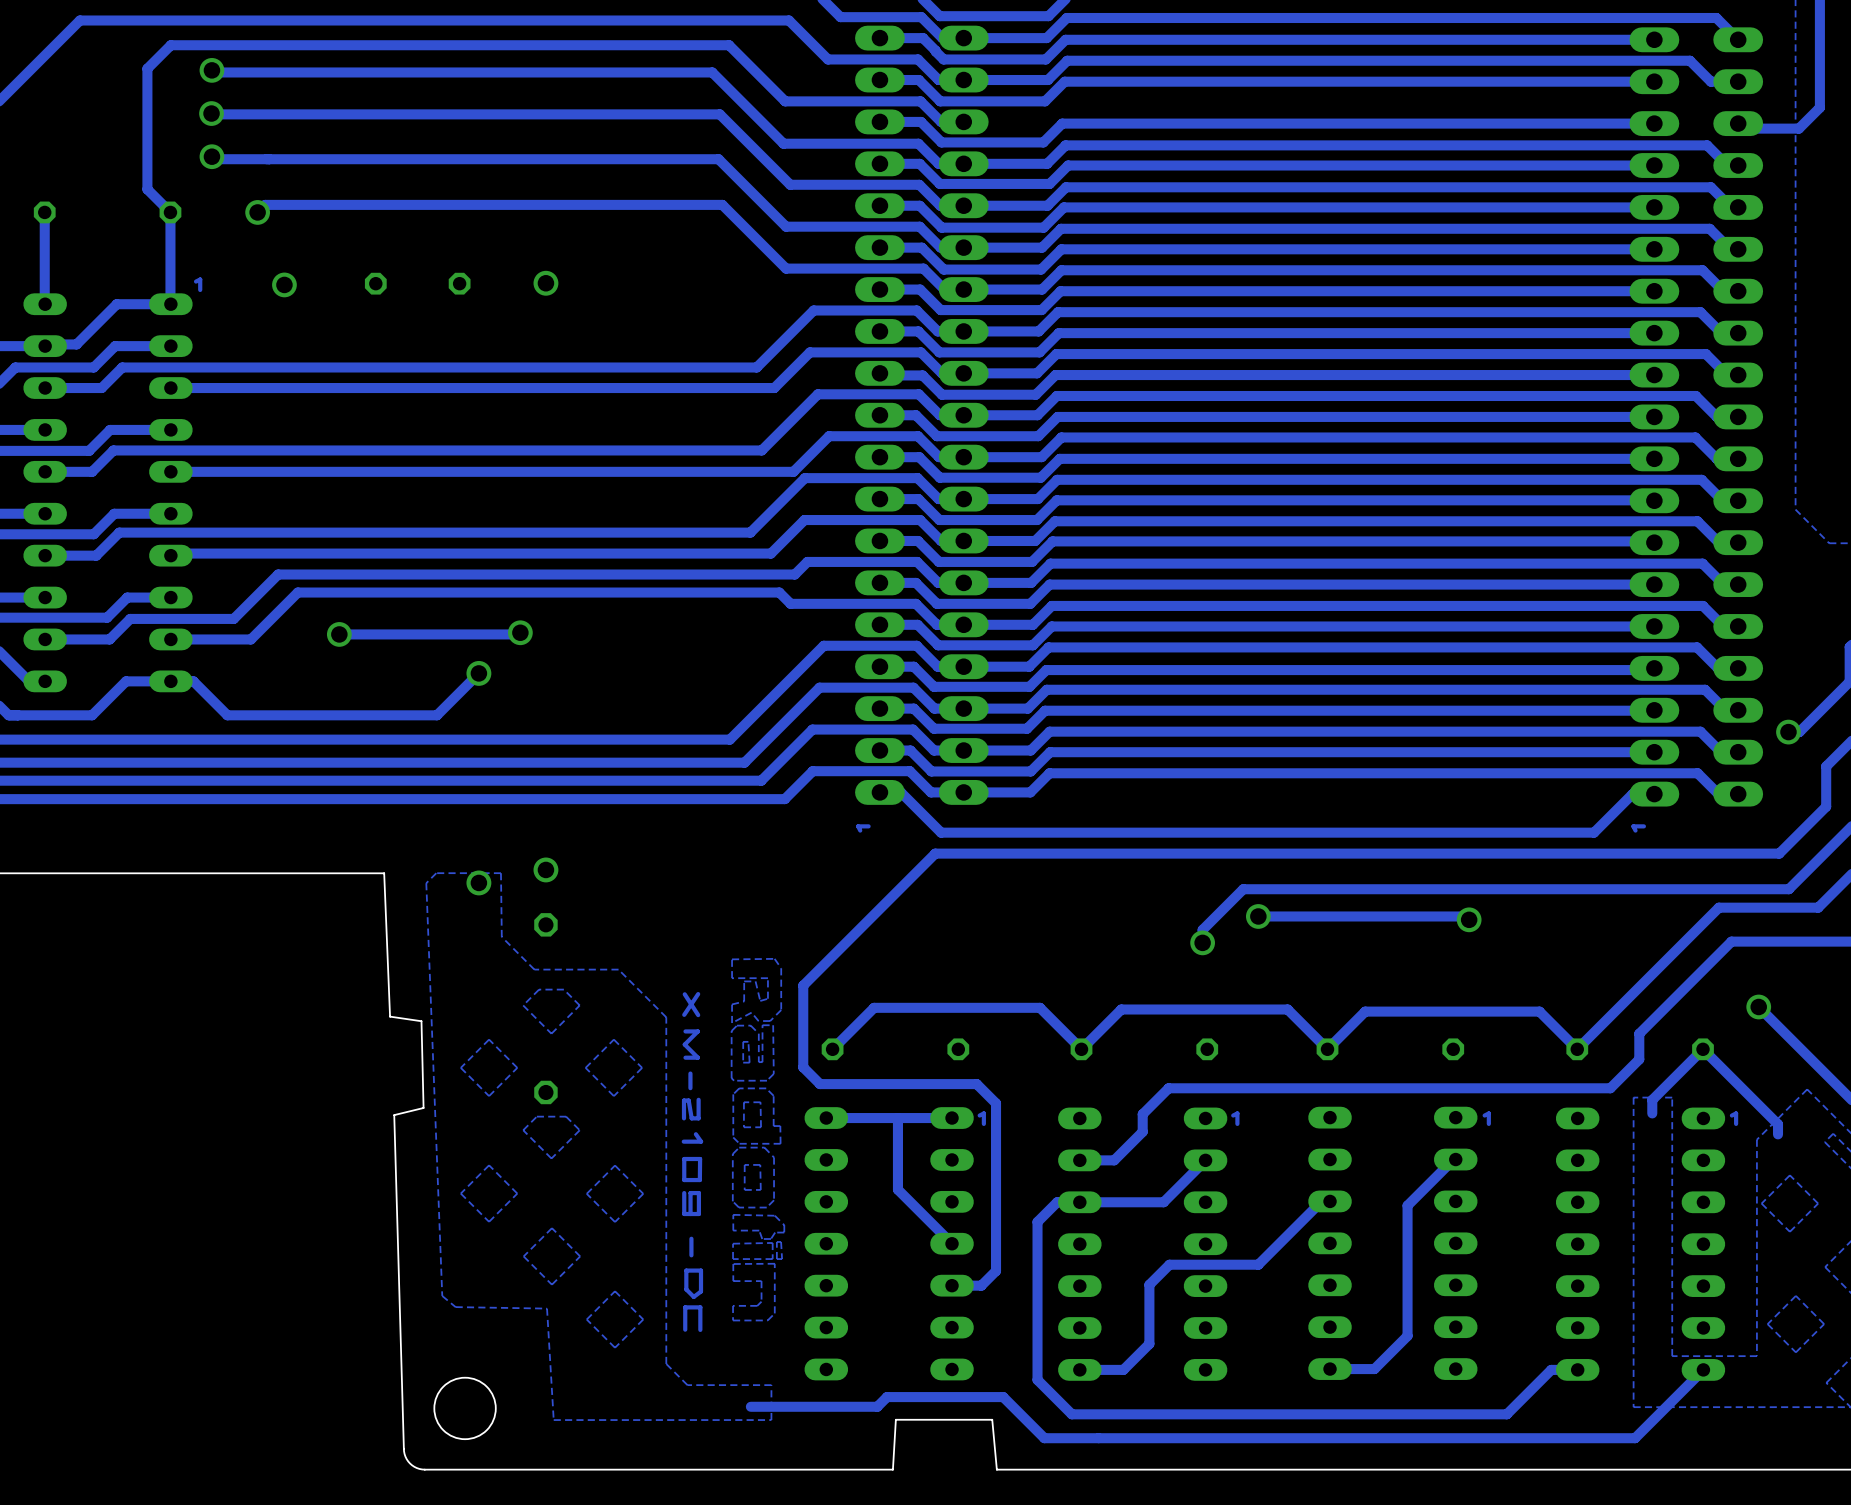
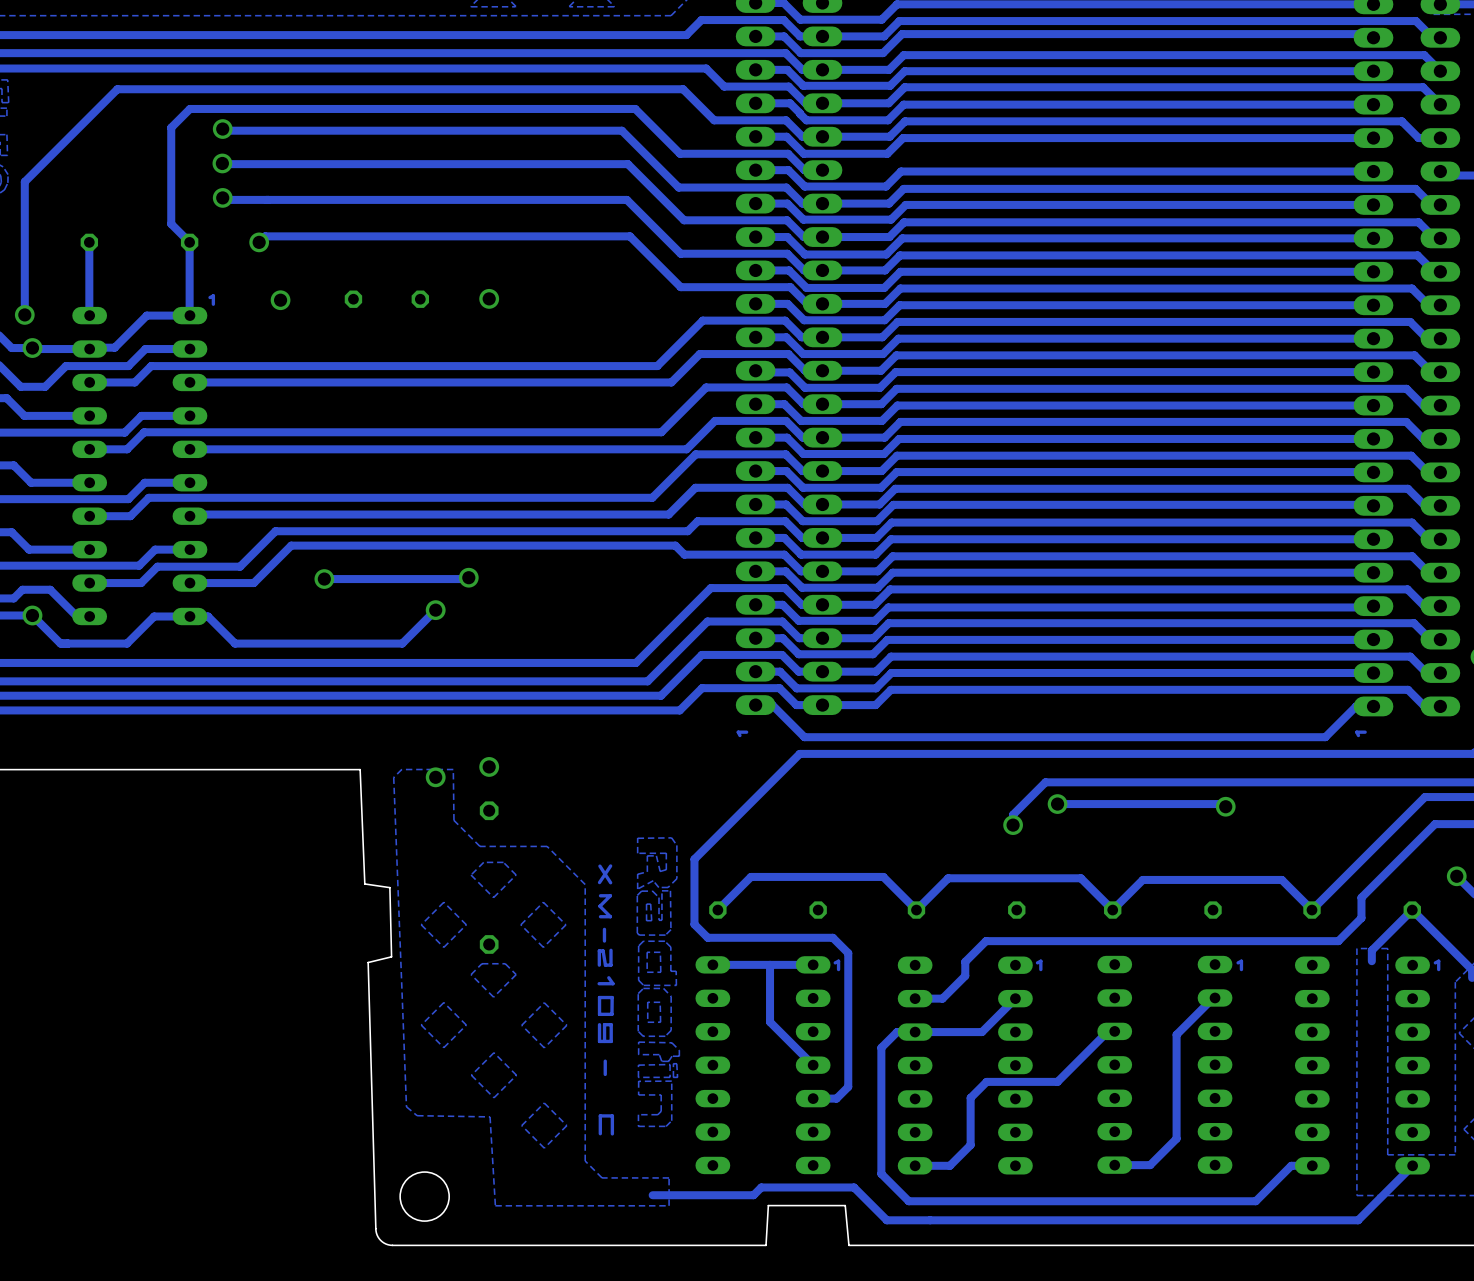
track: (701, 1270) (686, 1270) (686, 1289) (693, 1296) (701, 1291) (701, 1270) -> none

